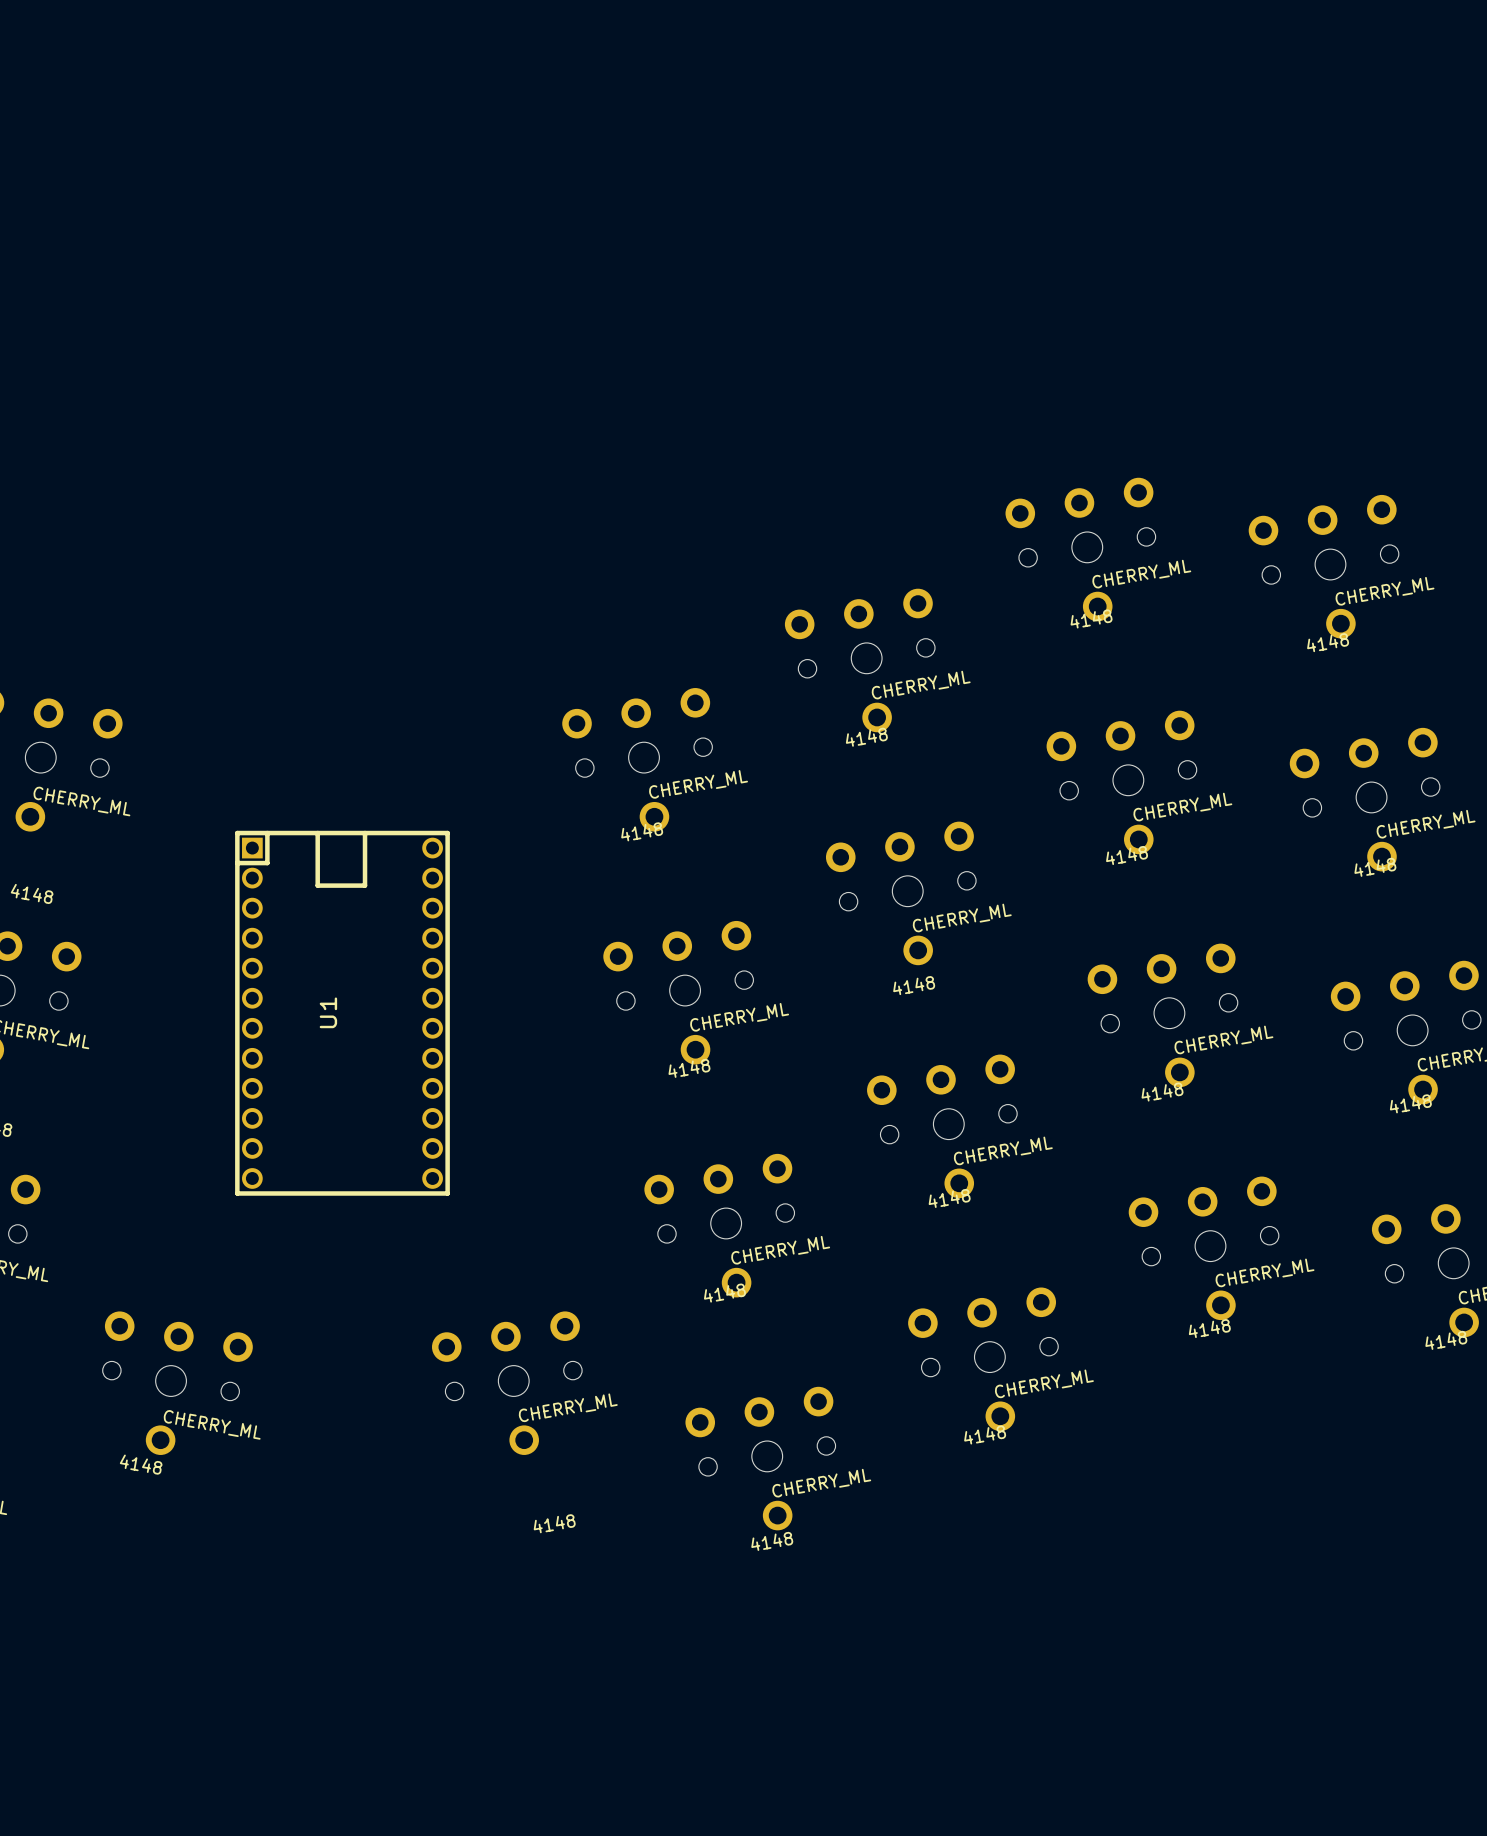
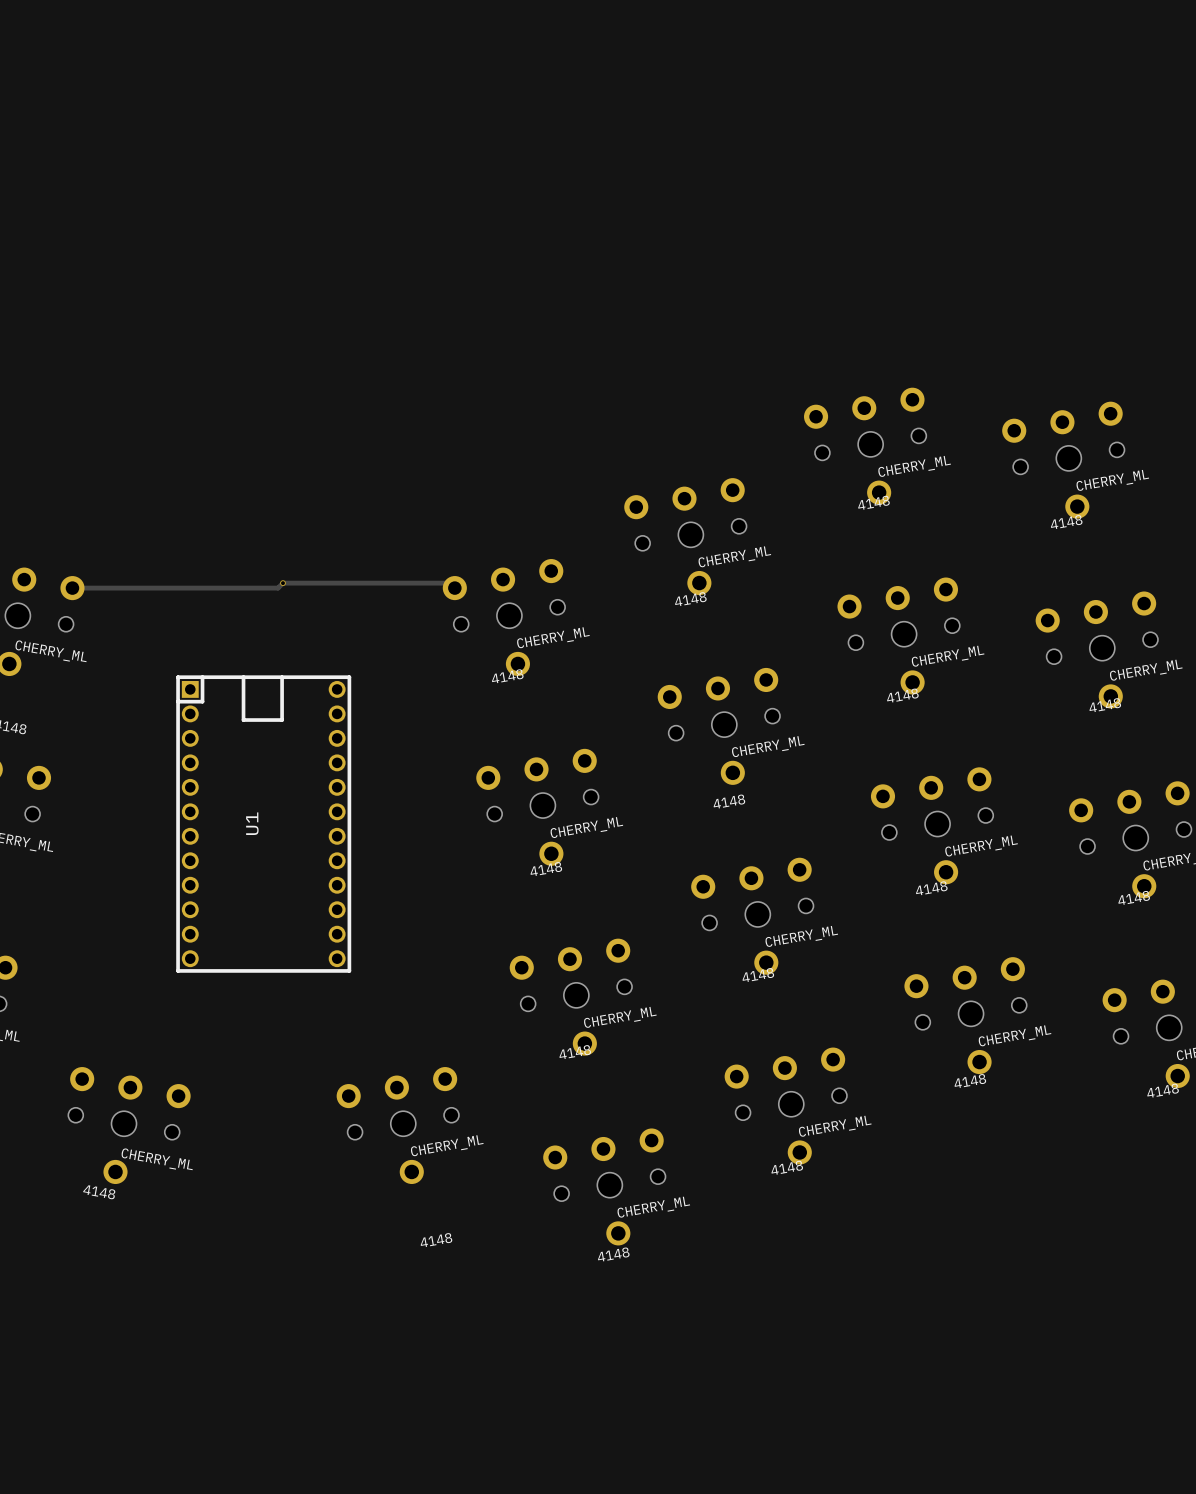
via: none -> (282, 583)
track: none -> (449, 583) (282, 583) (278, 588) (72, 588)

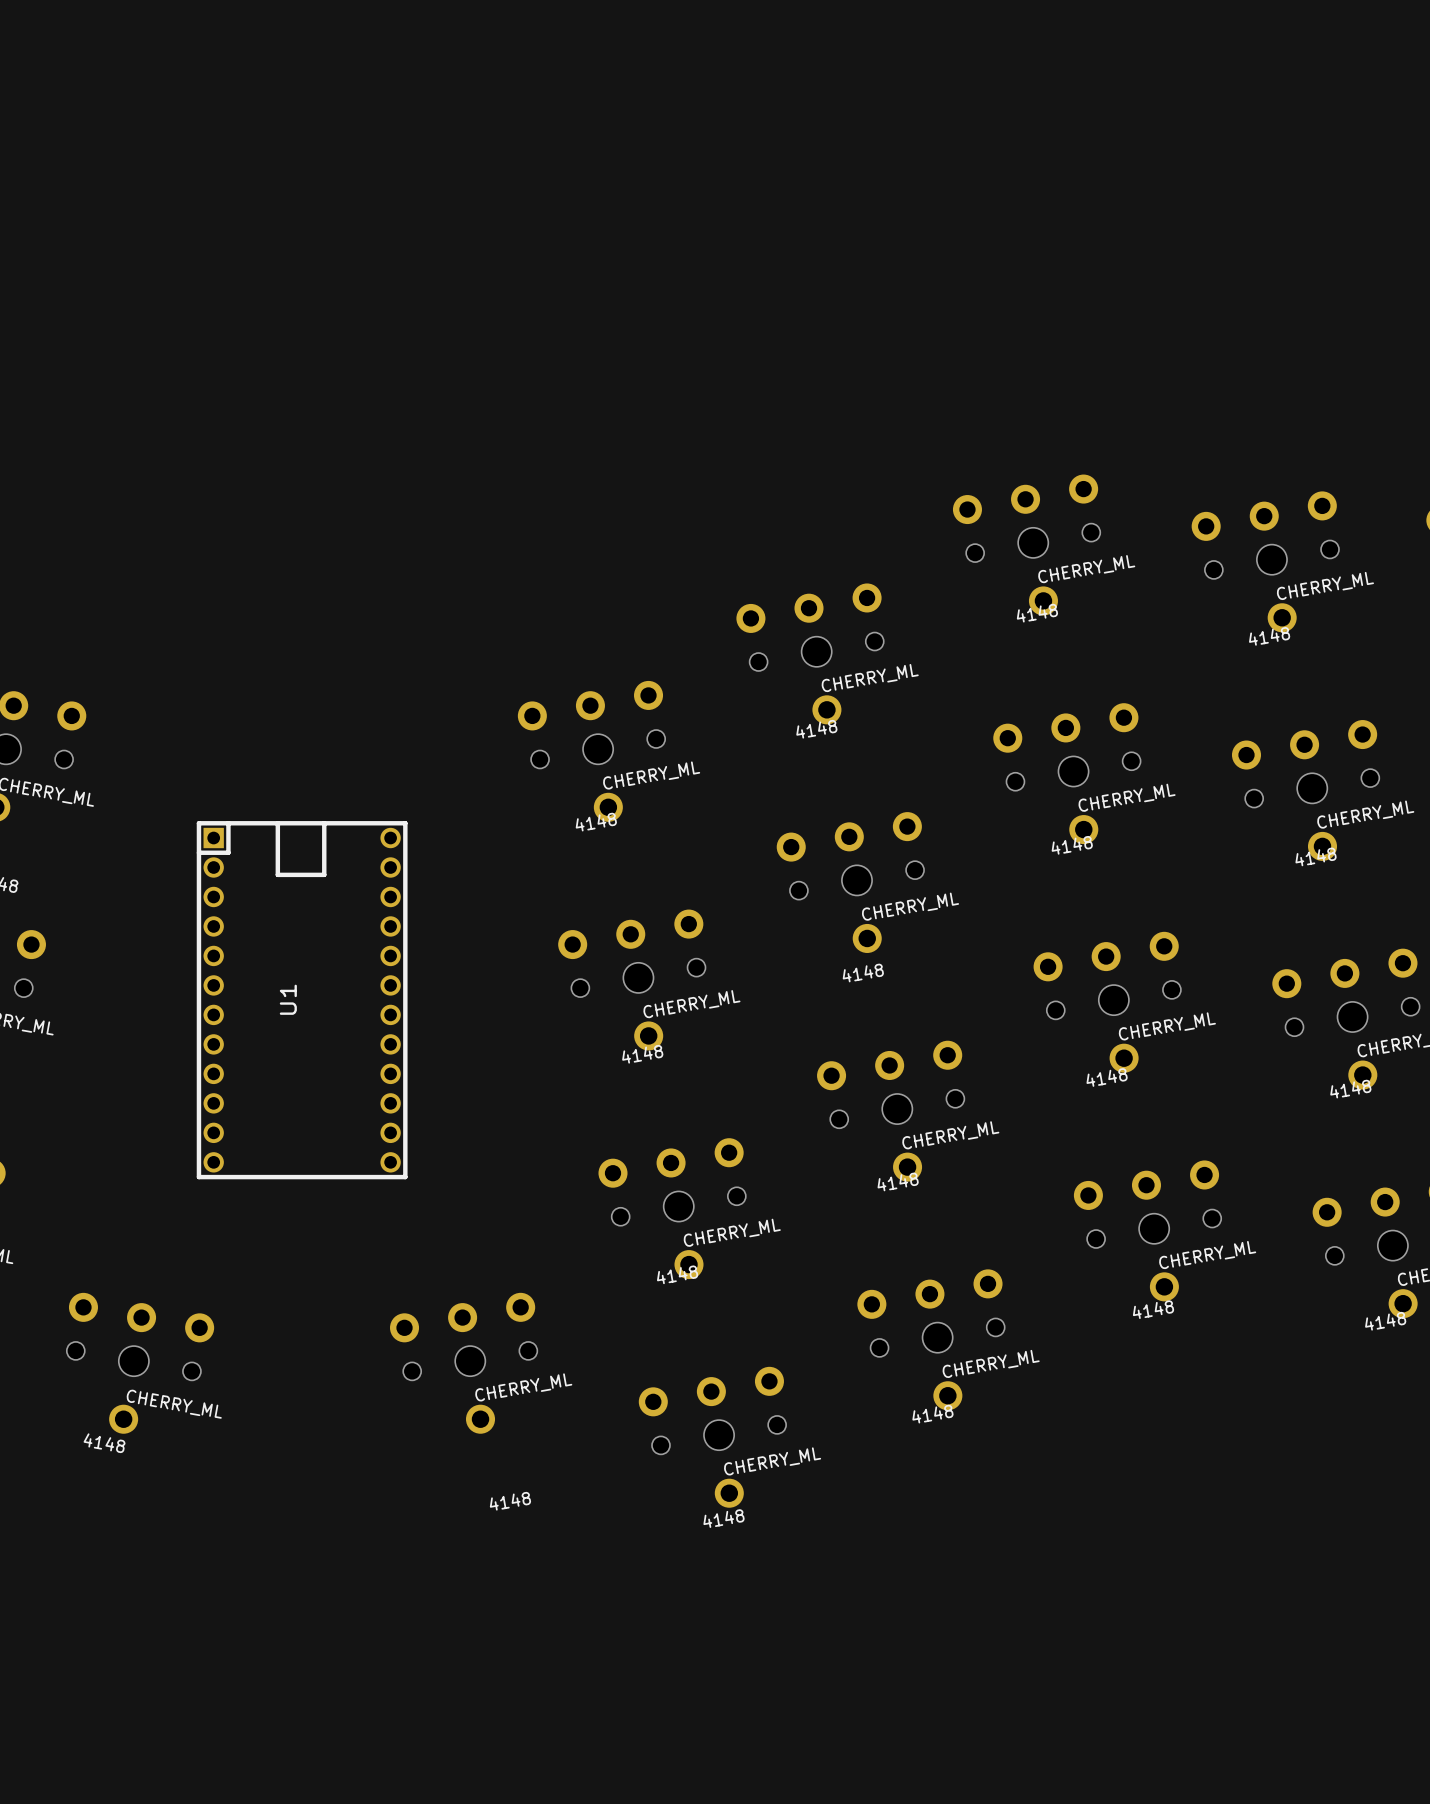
via: (282, 583) -> none
track: (72, 588) (278, 588) (282, 583) (449, 583) (454, 588) -> none

